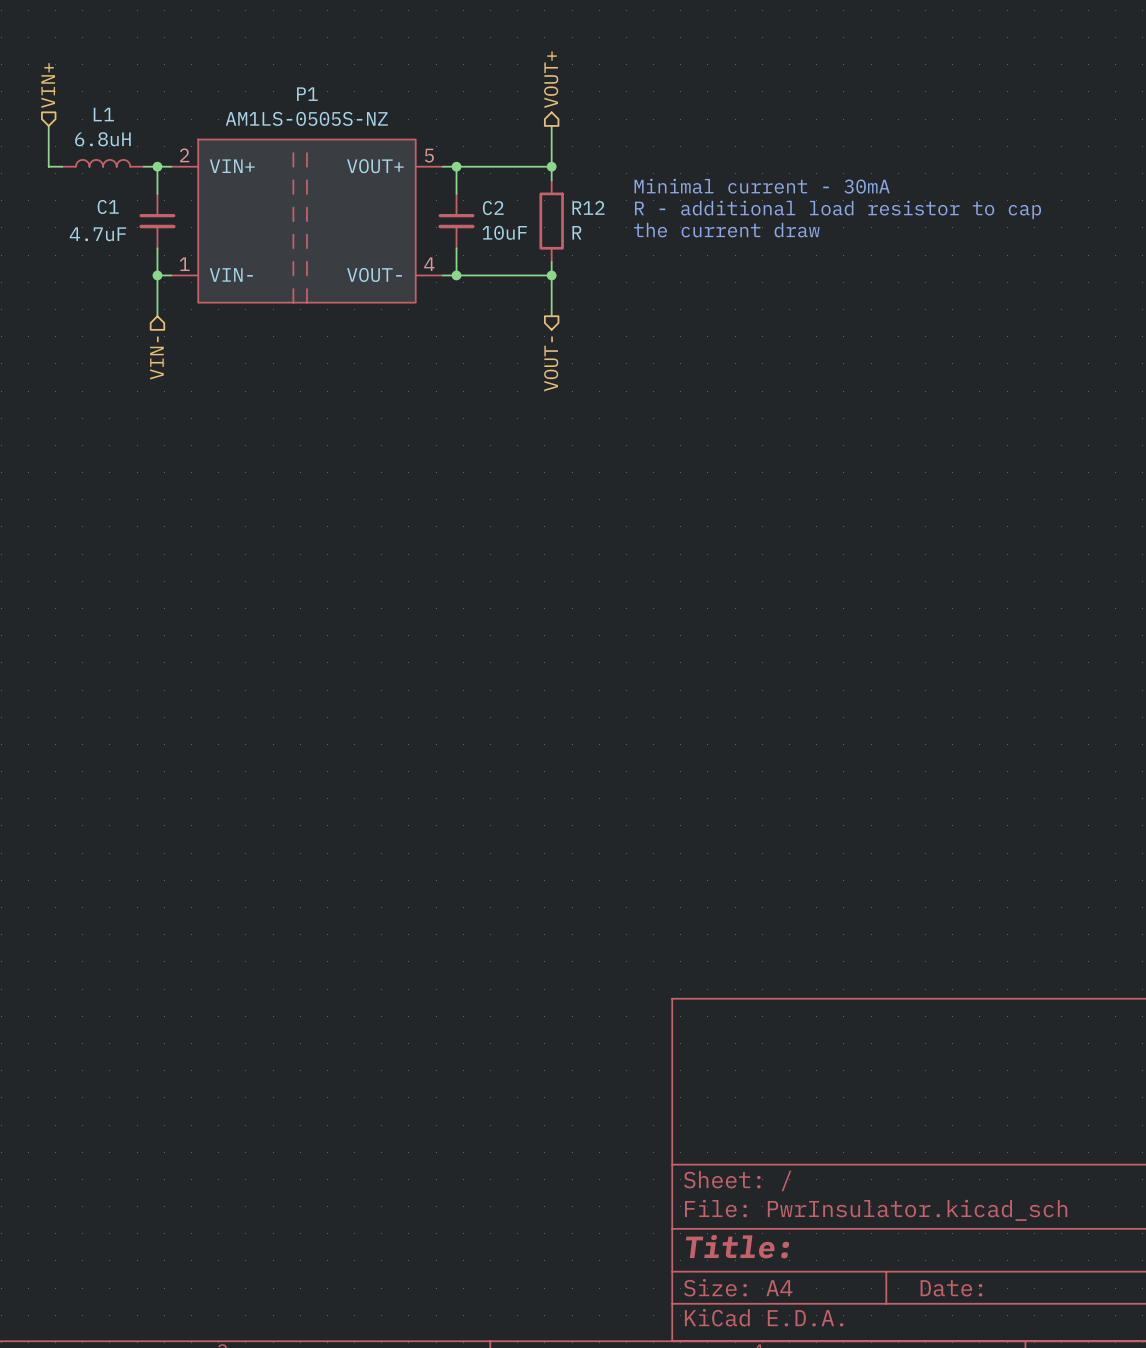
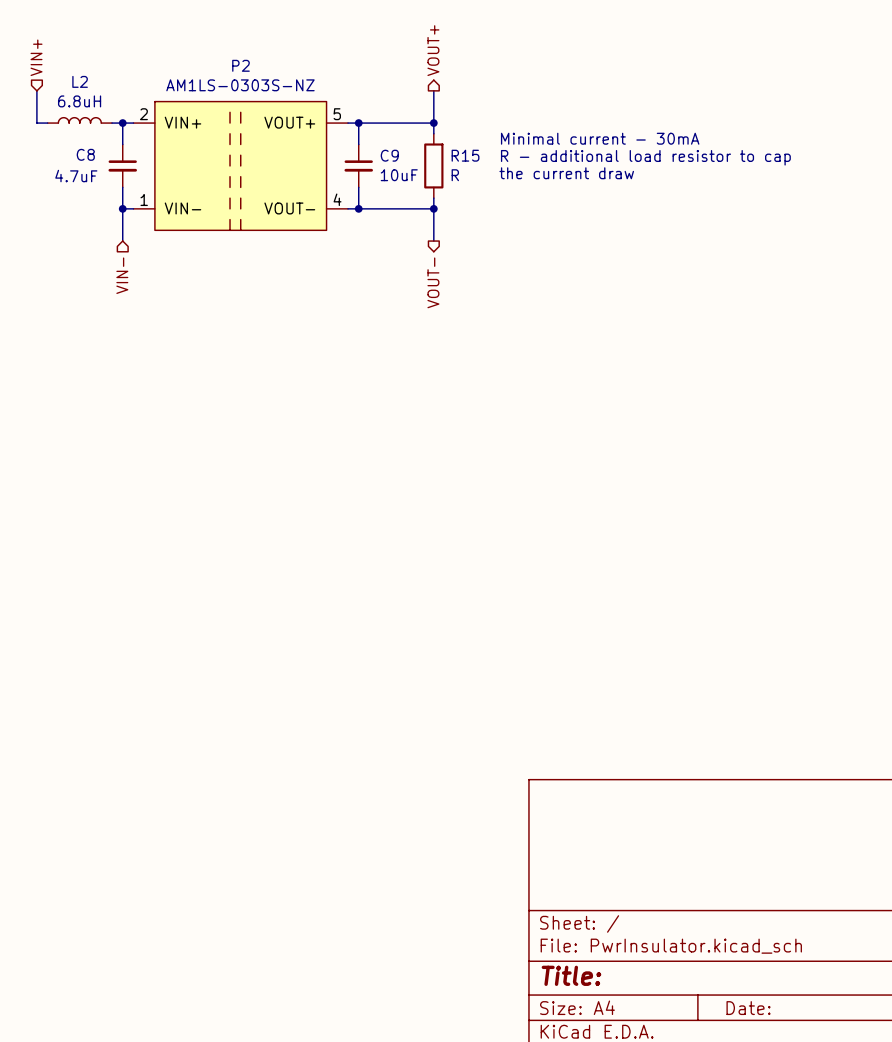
P1 name: P1 (307, 94) -> P2 (240, 65)
L1 name: L1 (103, 114) -> L2 (80, 81)
P1 value: AM1LS-0505S-NZ (306, 118) -> AM1LS-0303S-NZ (240, 85)
C1 name: C1 (108, 206) -> C8 (85, 154)
R12 name: R12 (588, 207) -> R15 (465, 155)
C2 name: C2 (493, 208) -> C9 (389, 155)

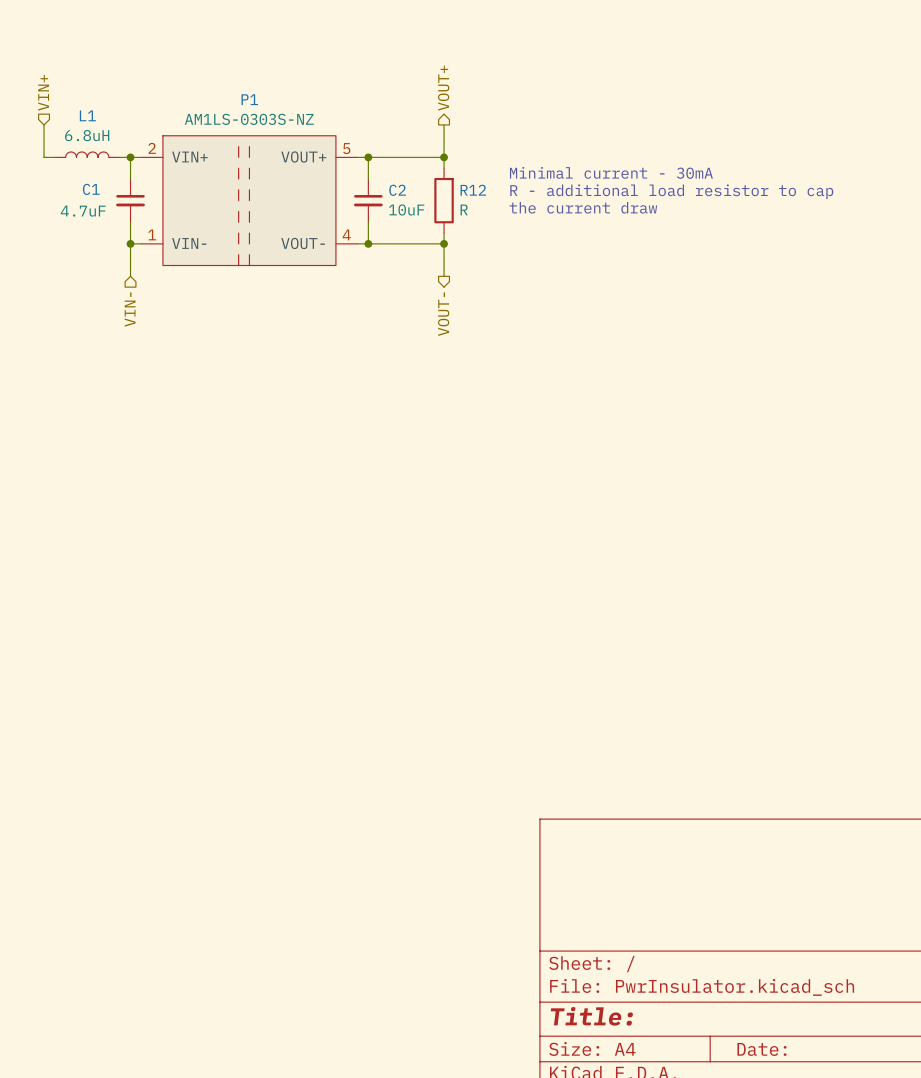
P2 name: P2 (240, 65) -> P1 (249, 99)
L2 name: L2 (80, 81) -> L1 (87, 115)
C8 name: C8 (85, 154) -> C1 (91, 189)
C9 name: C9 (389, 155) -> C2 (397, 190)
R15 name: R15 (465, 155) -> R12 (473, 190)

